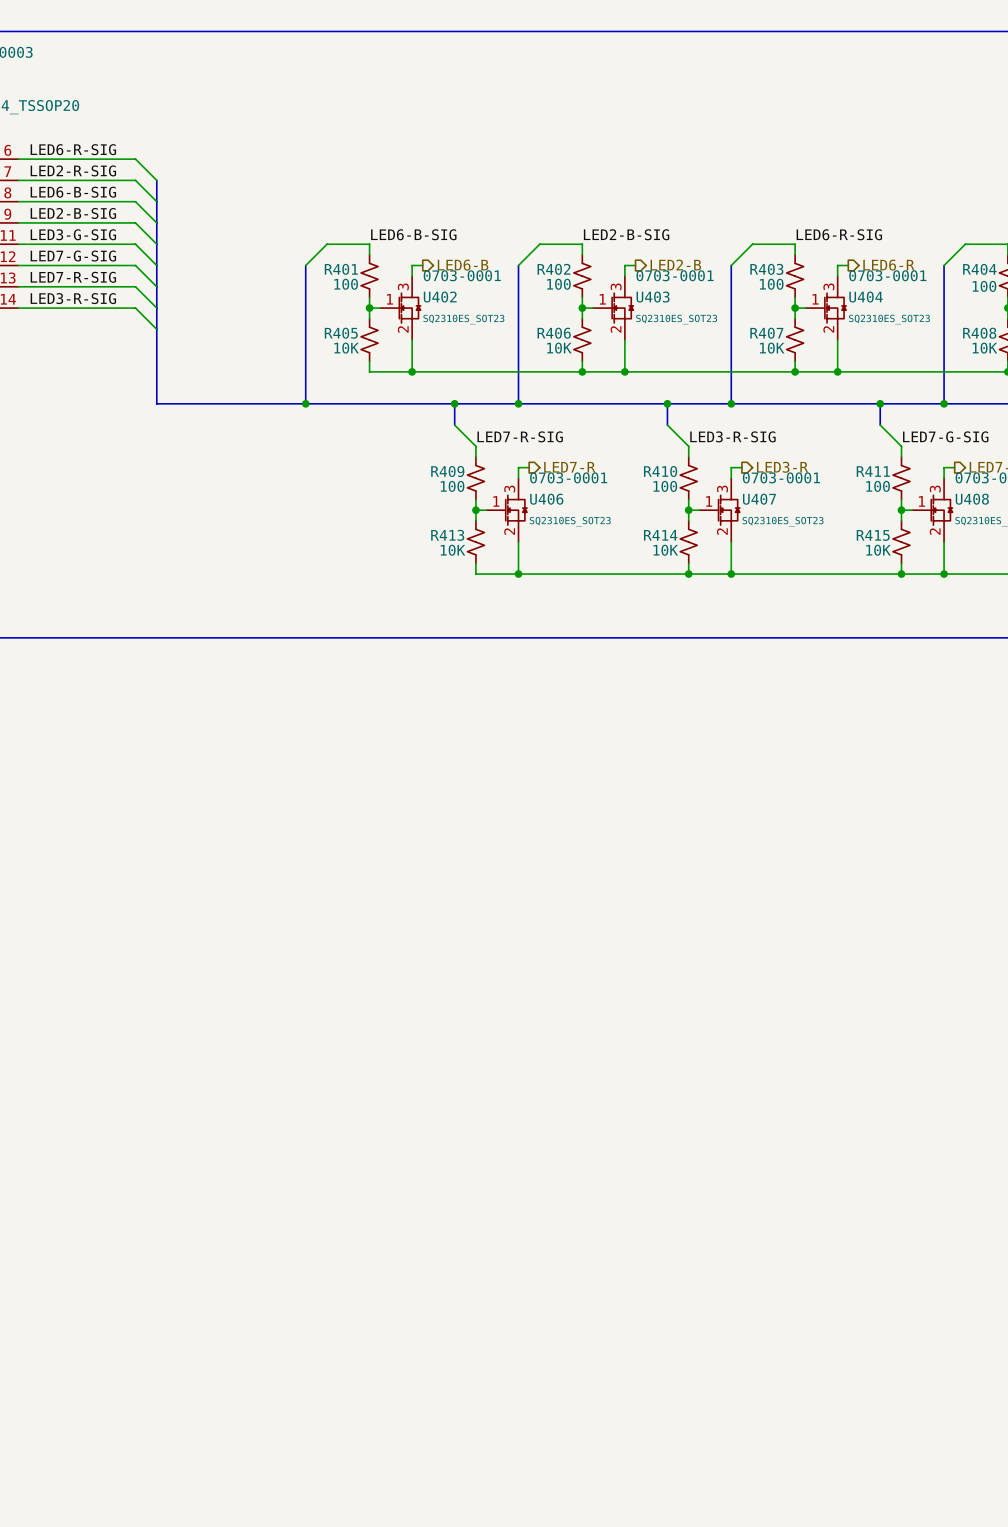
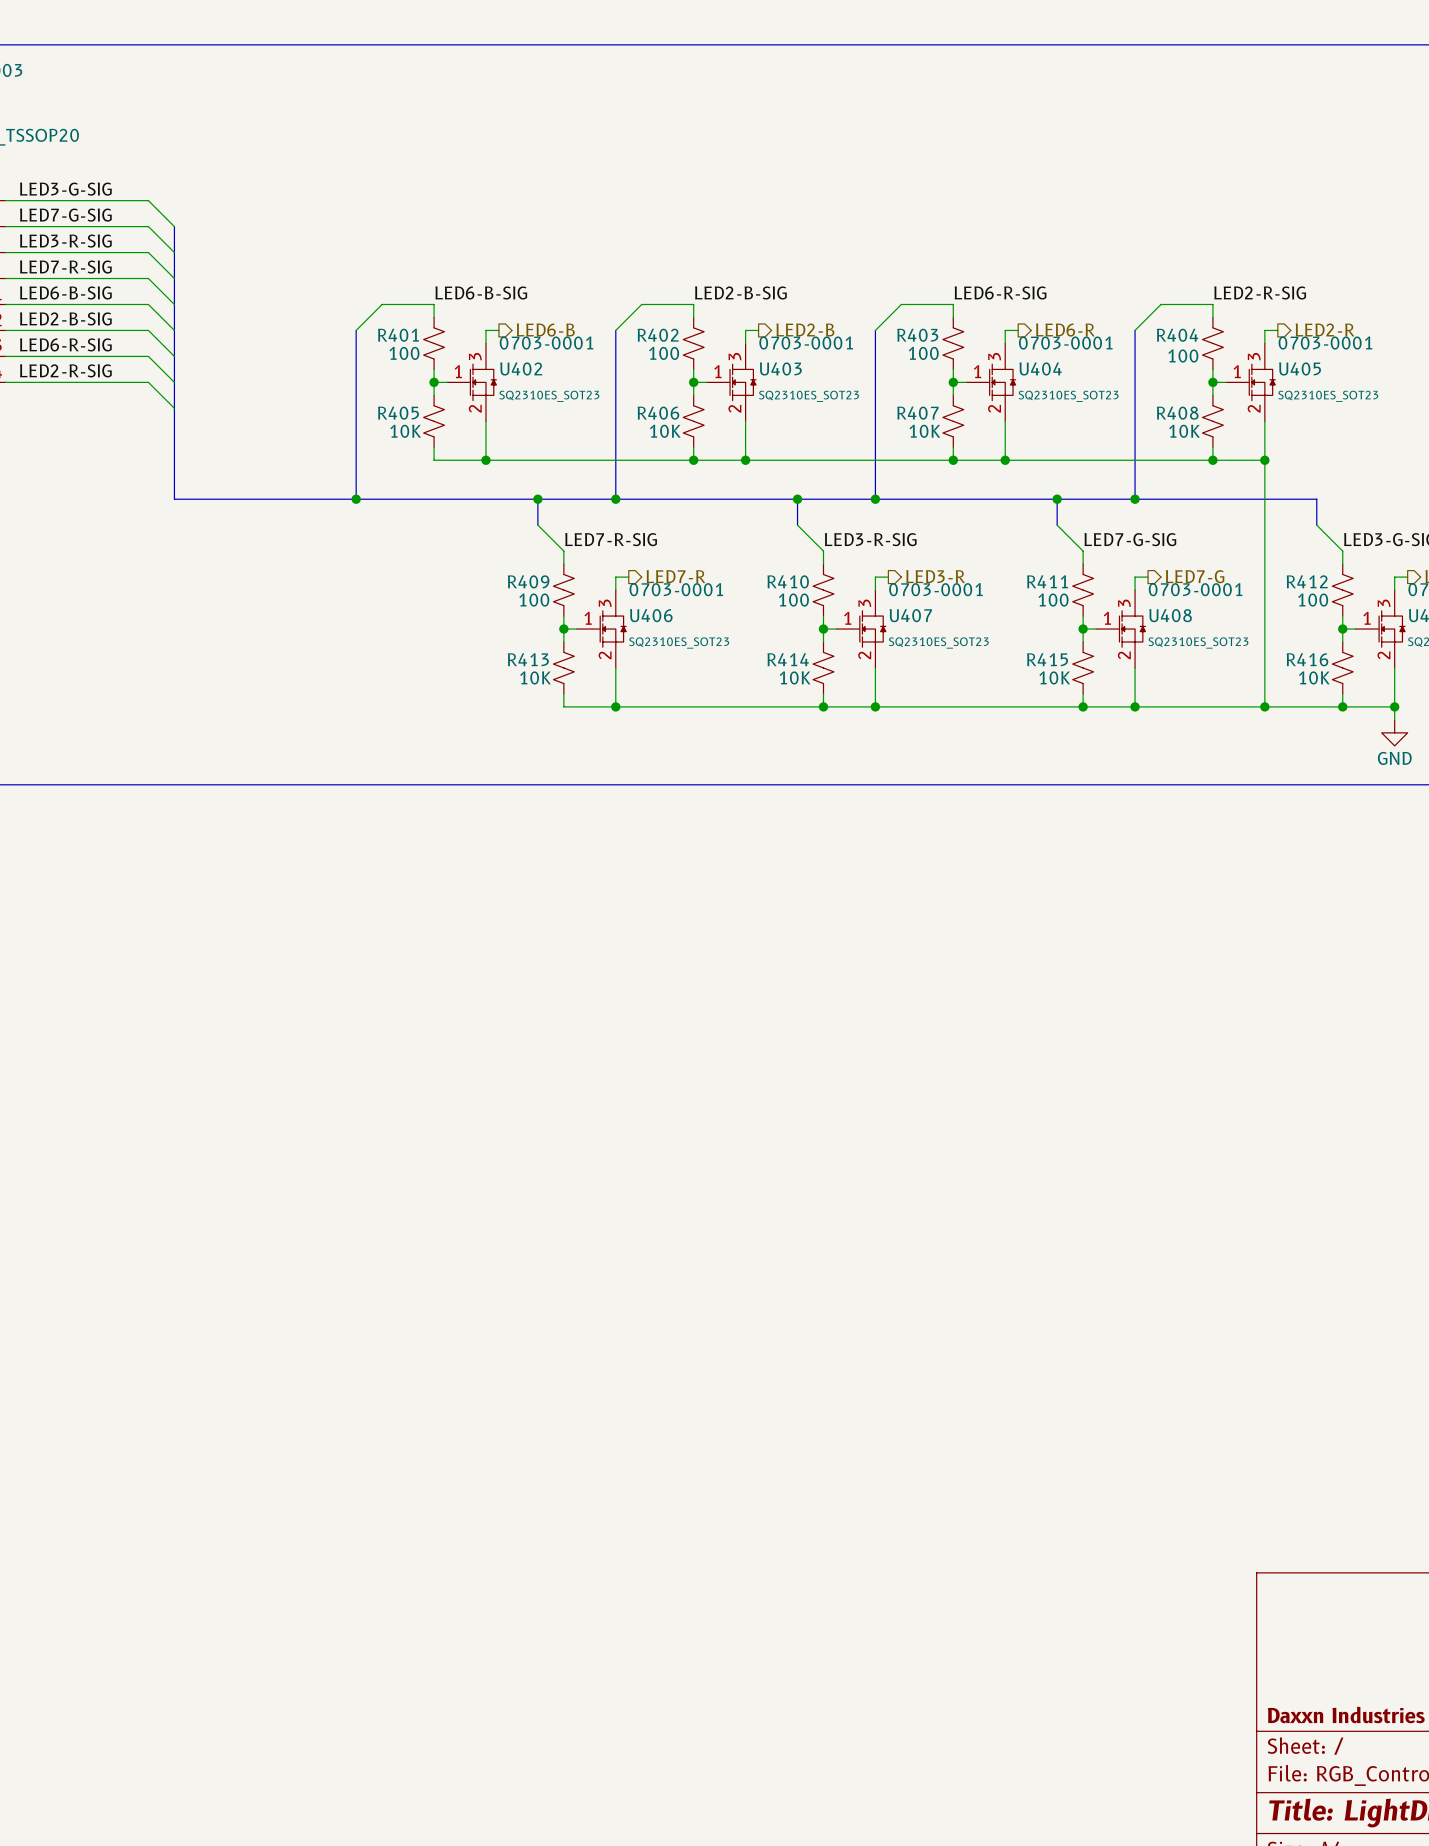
label: LED6-R-SIG (73, 149) -> LED3-G-SIG (65, 189)
label: LED2-R-SIG (73, 170) -> LED7-G-SIG (65, 215)
label: LED6-B-SIG (73, 192) -> LED3-R-SIG (65, 241)
label: LED2-B-SIG (73, 213) -> LED7-R-SIG (65, 267)
label: LED3-G-SIG (73, 234) -> LED6-B-SIG (65, 292)
label: LED7-G-SIG (73, 256) -> LED2-B-SIG (65, 318)
label: LED7-R-SIG (73, 277) -> LED6-R-SIG (65, 344)
label: LED3-R-SIG (73, 298) -> LED2-R-SIG (65, 370)

